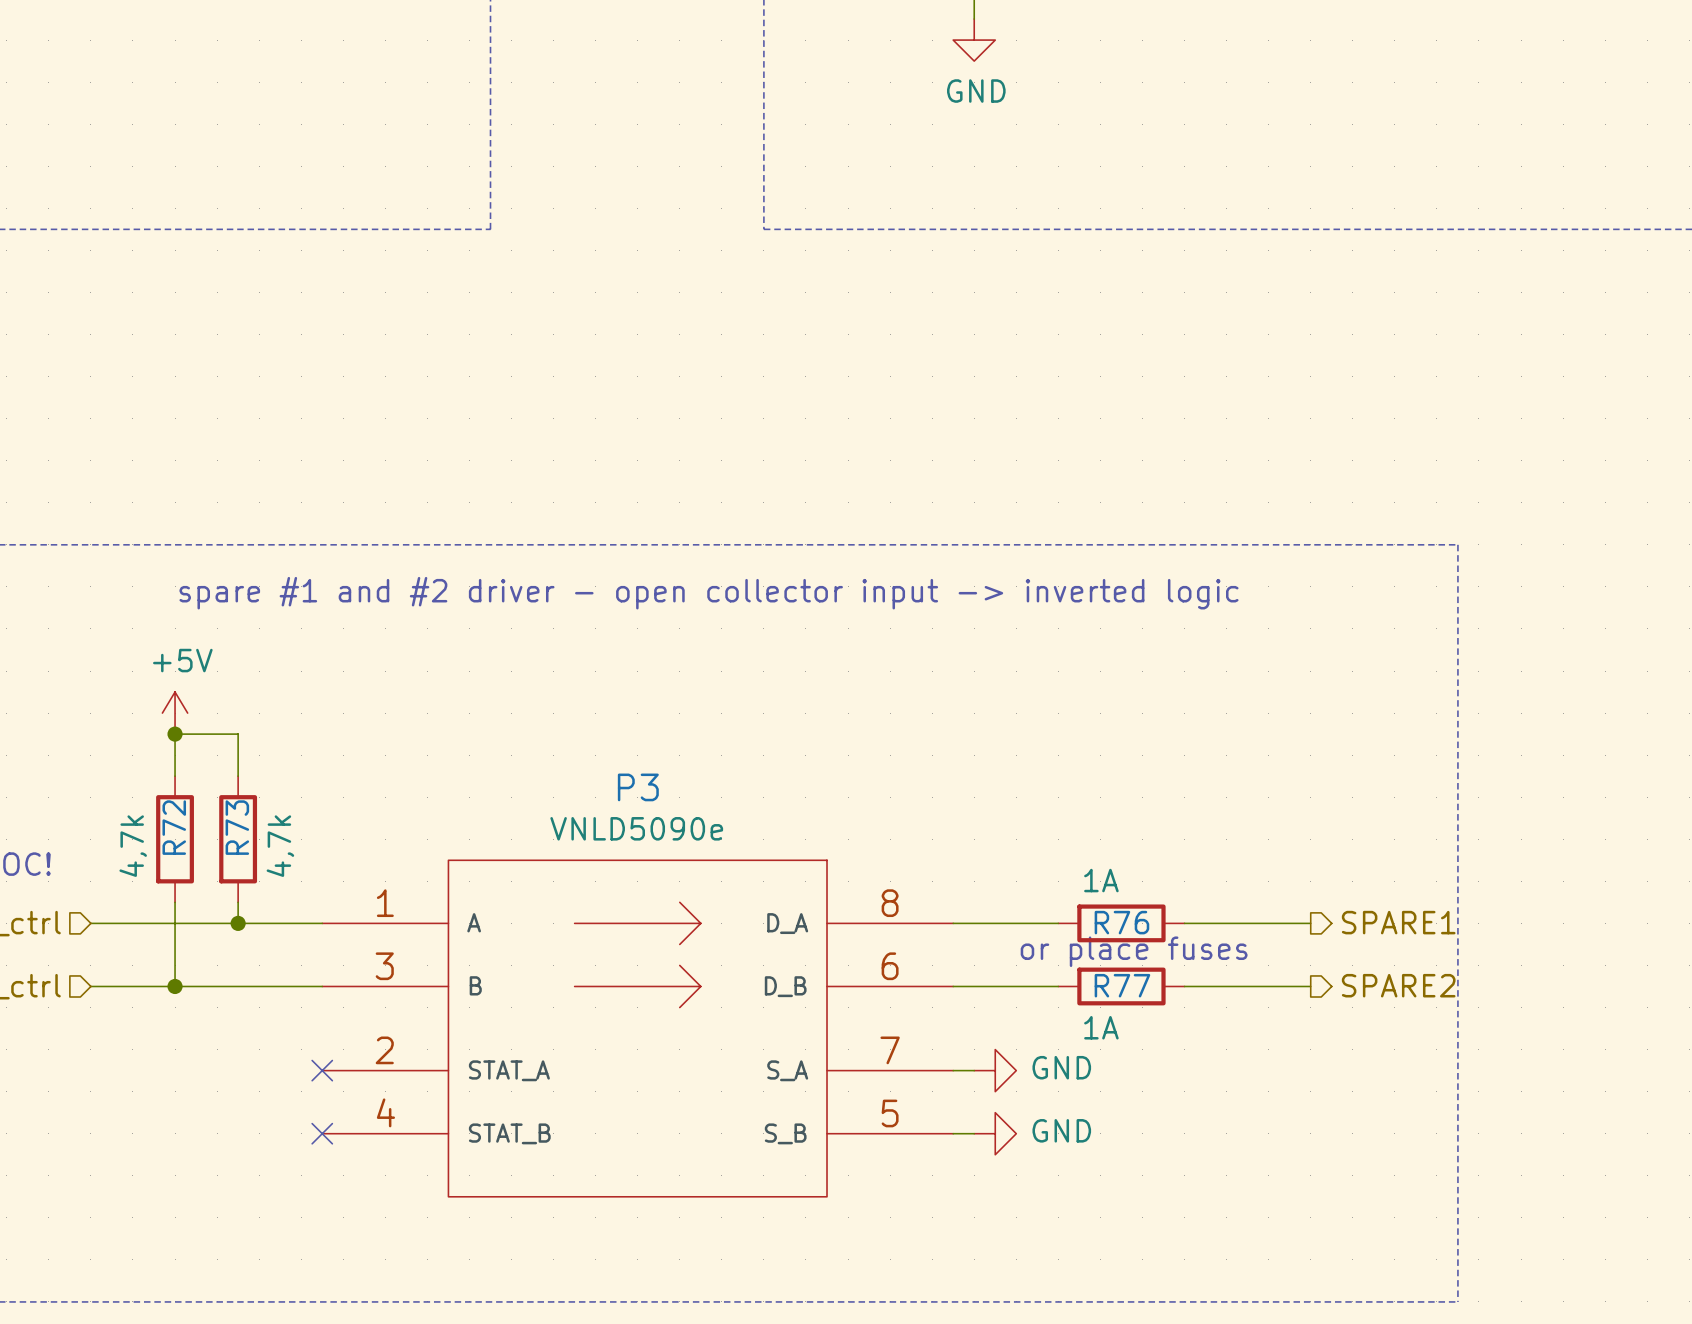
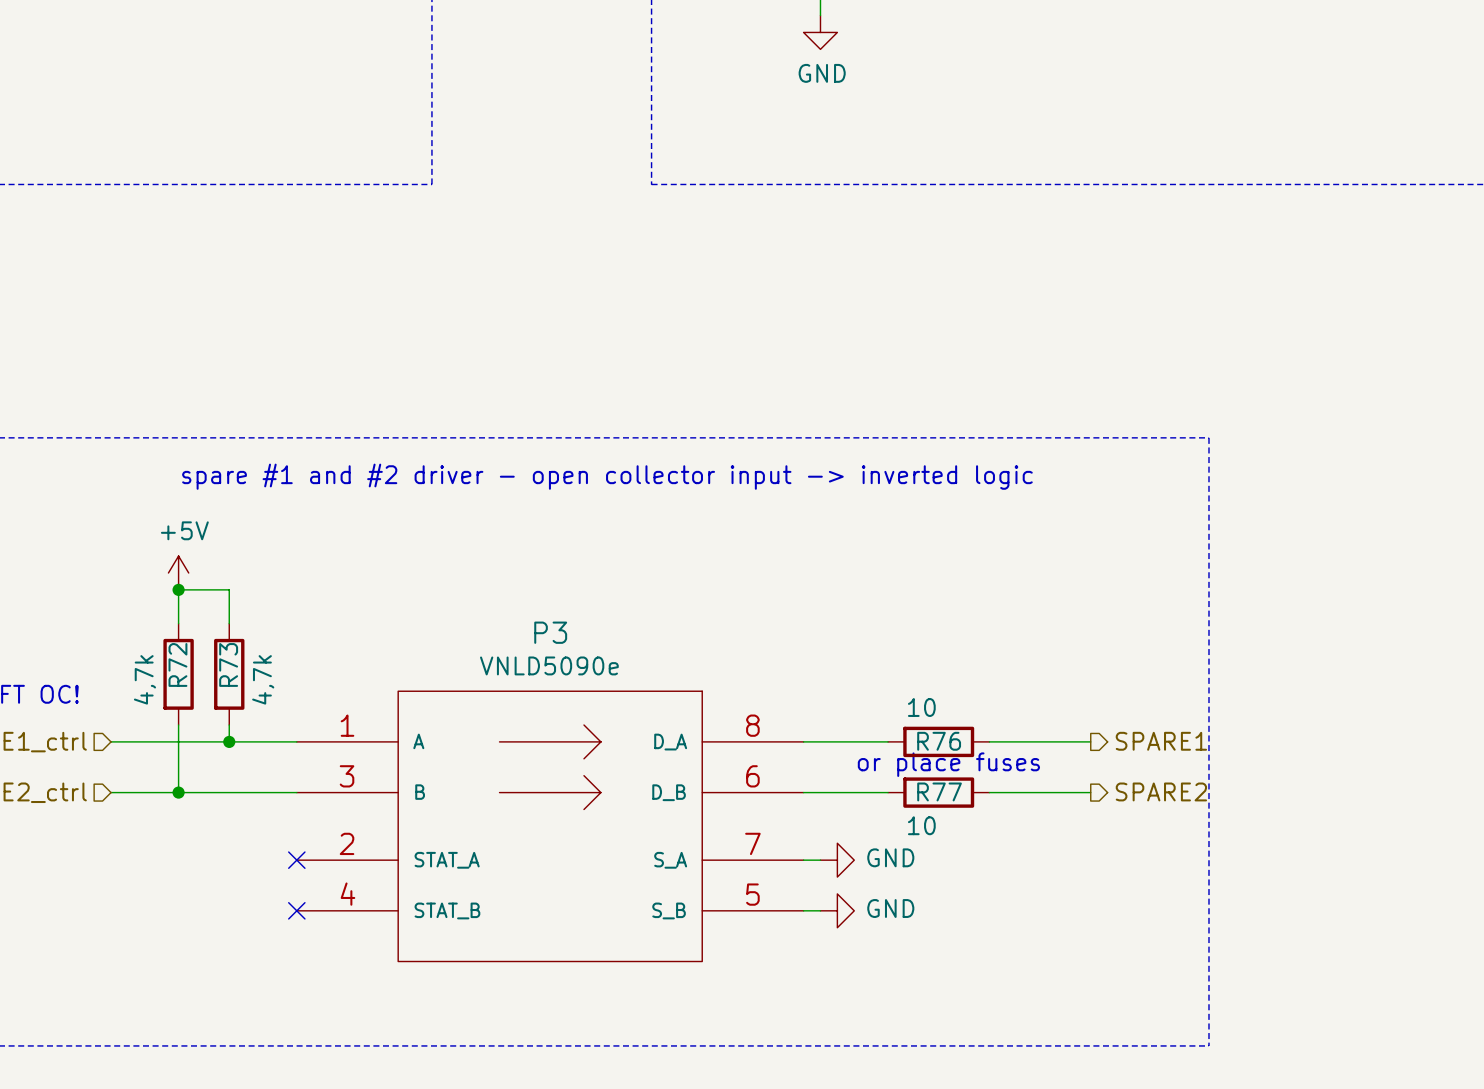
R76 value: 1A (1101, 880) -> 10 (921, 707)
R77 value: 1A (1101, 1027) -> 10 (921, 825)

